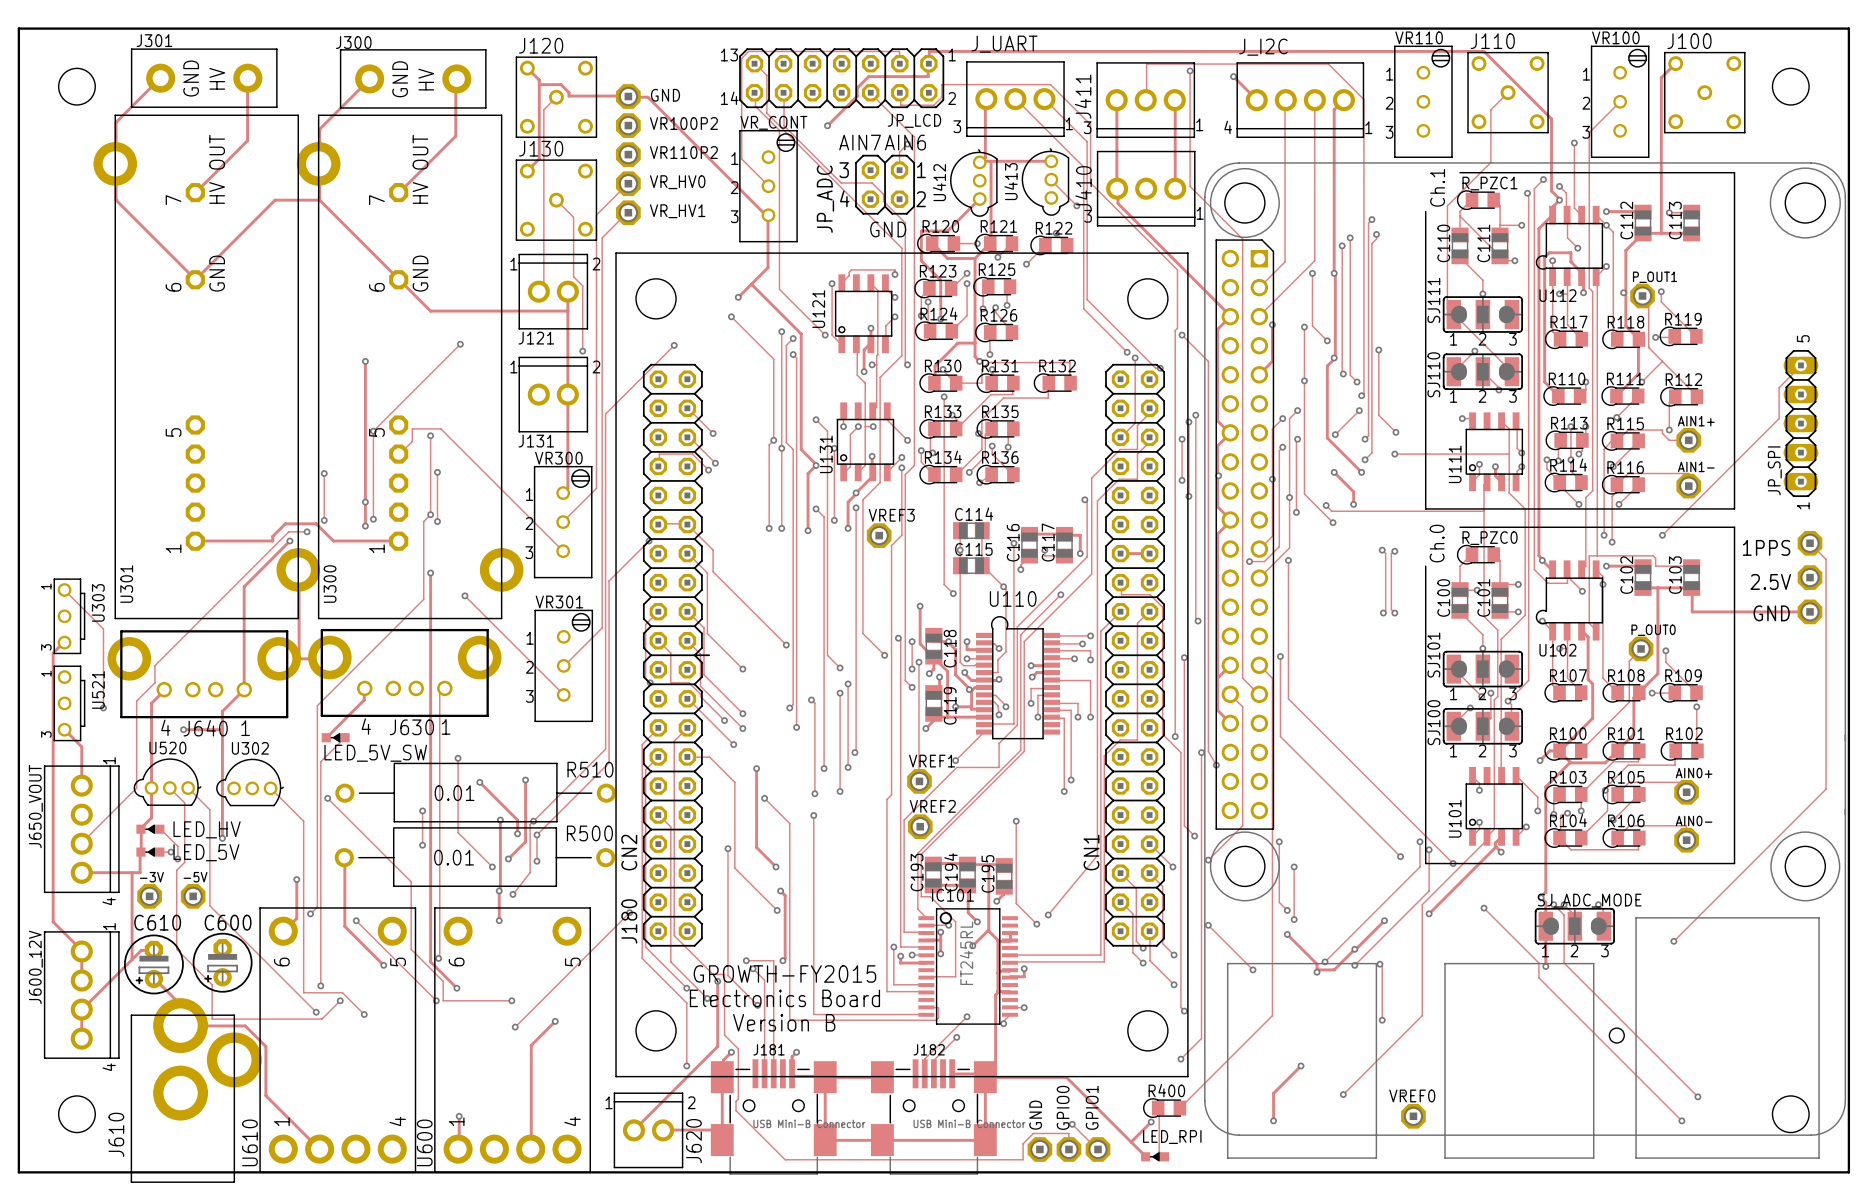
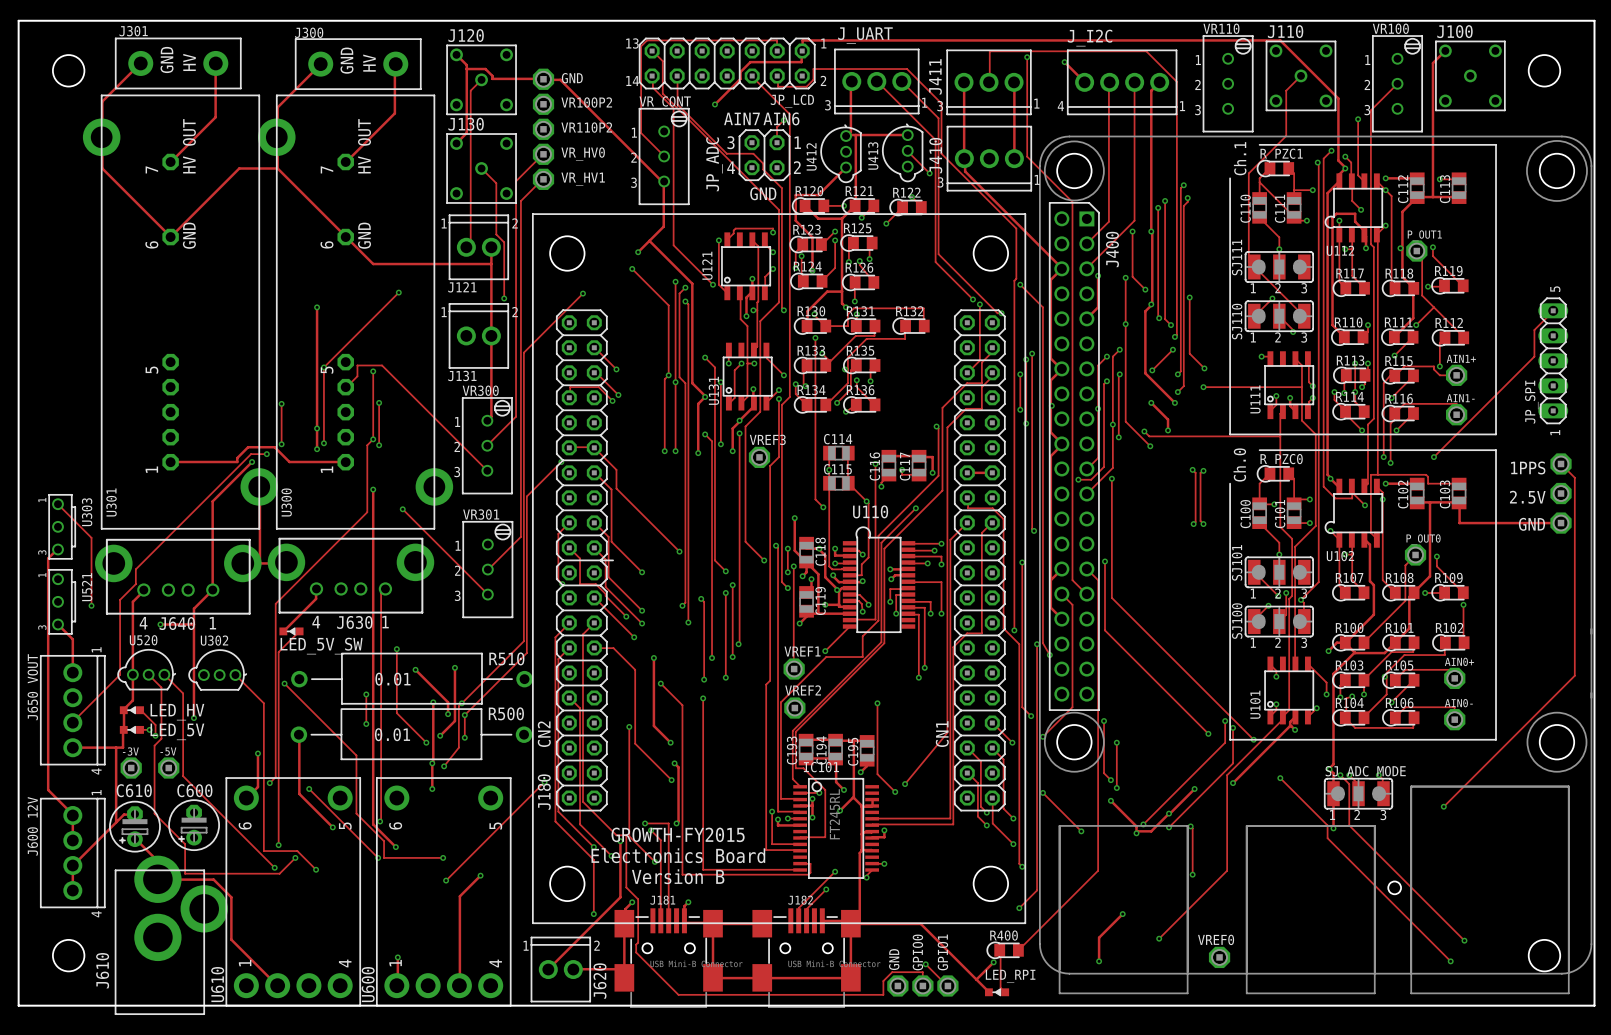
part: (1525, 660) -> none
J400: none -> (1315, 564)

